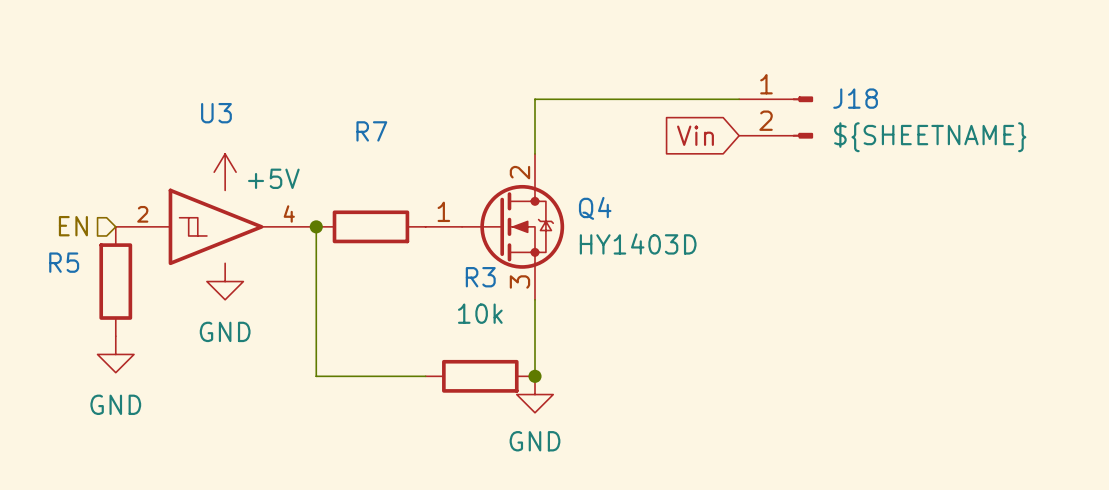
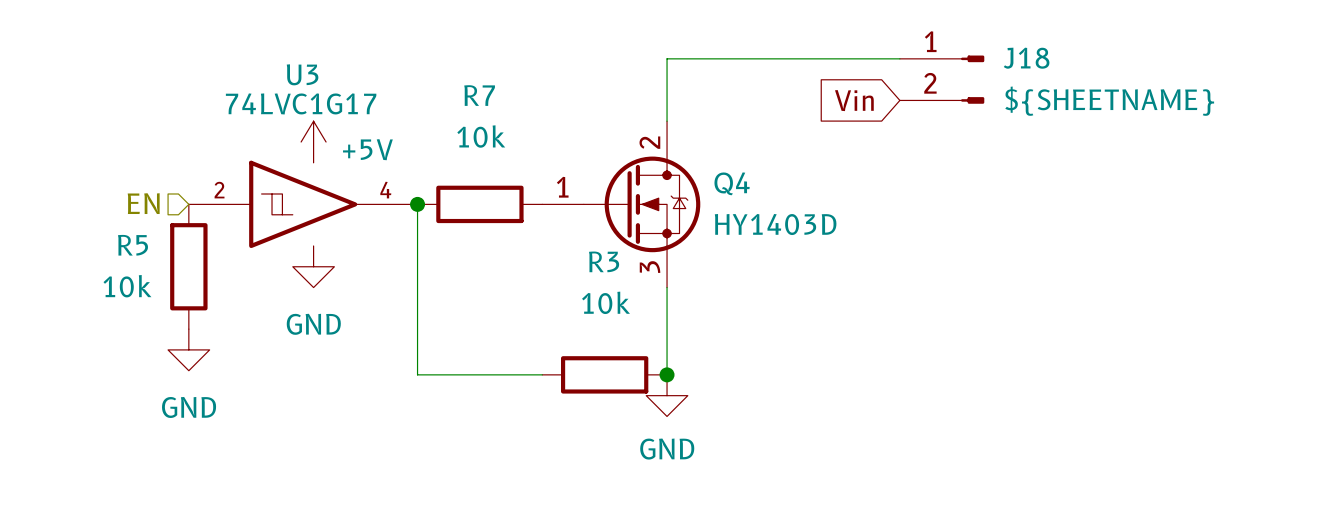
U3 value: none -> 74LVC1G17 (301, 103)
R7 value: none -> 10k (481, 136)
R5 value: none -> 10k (127, 286)

